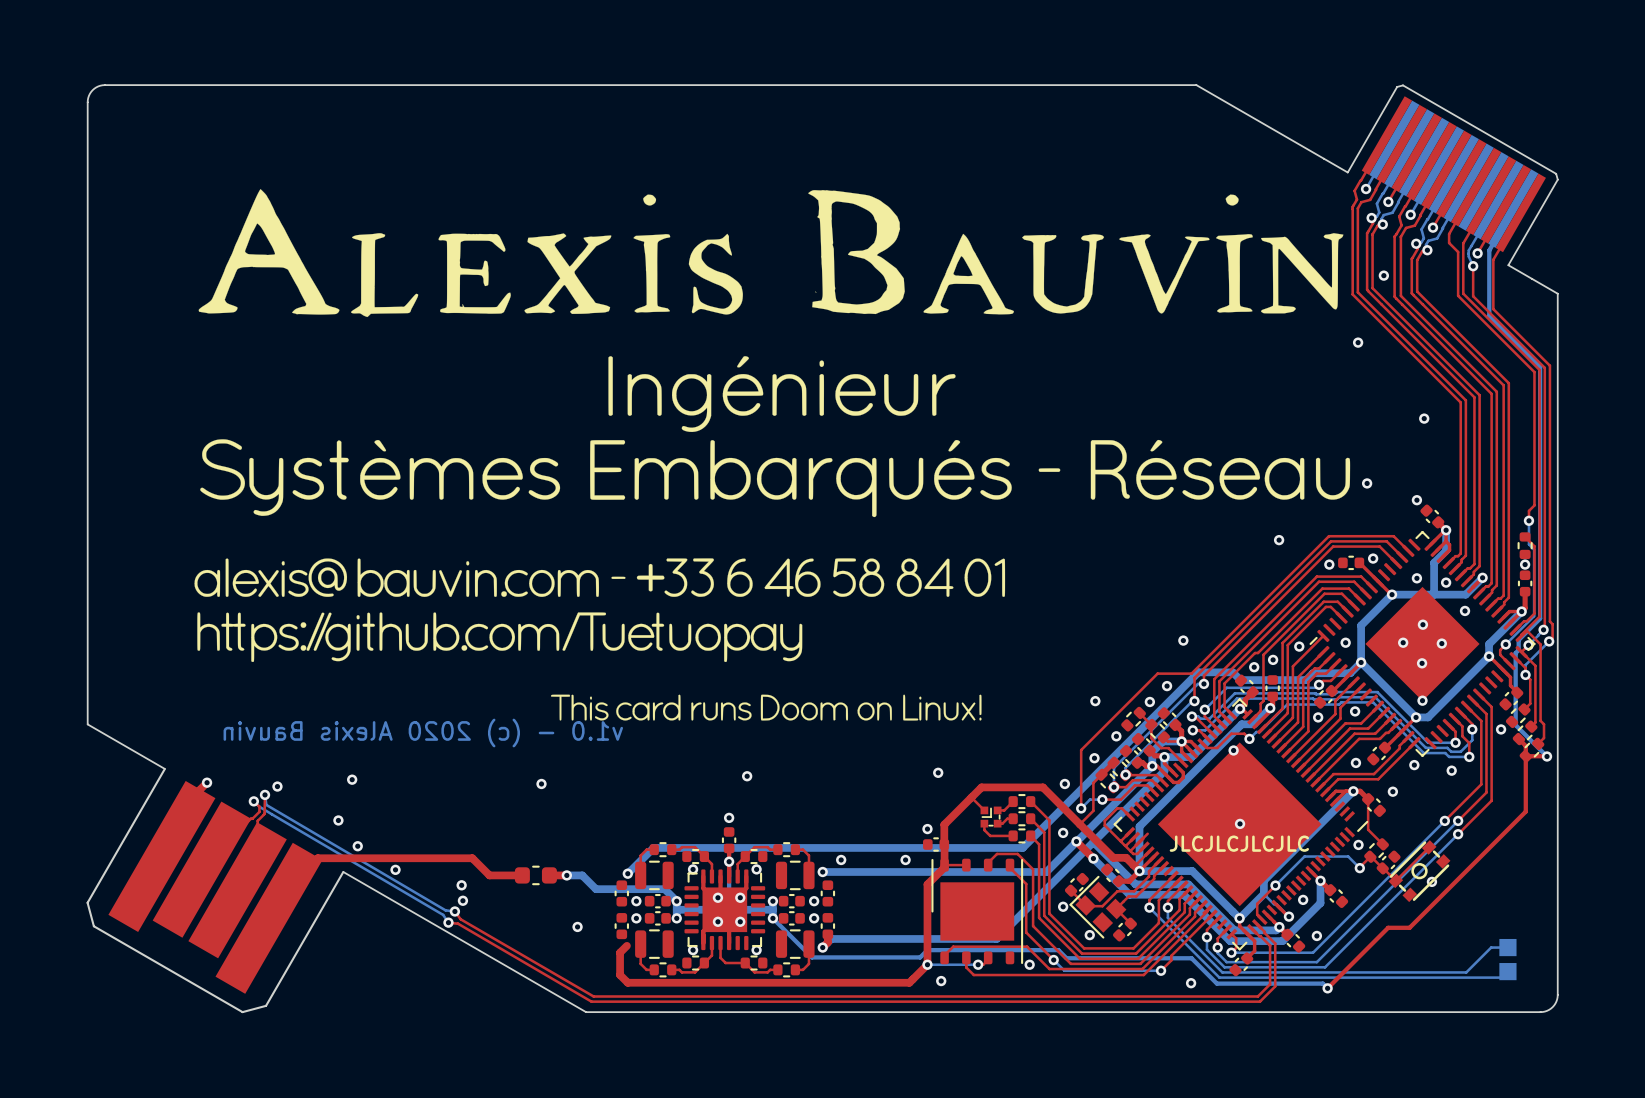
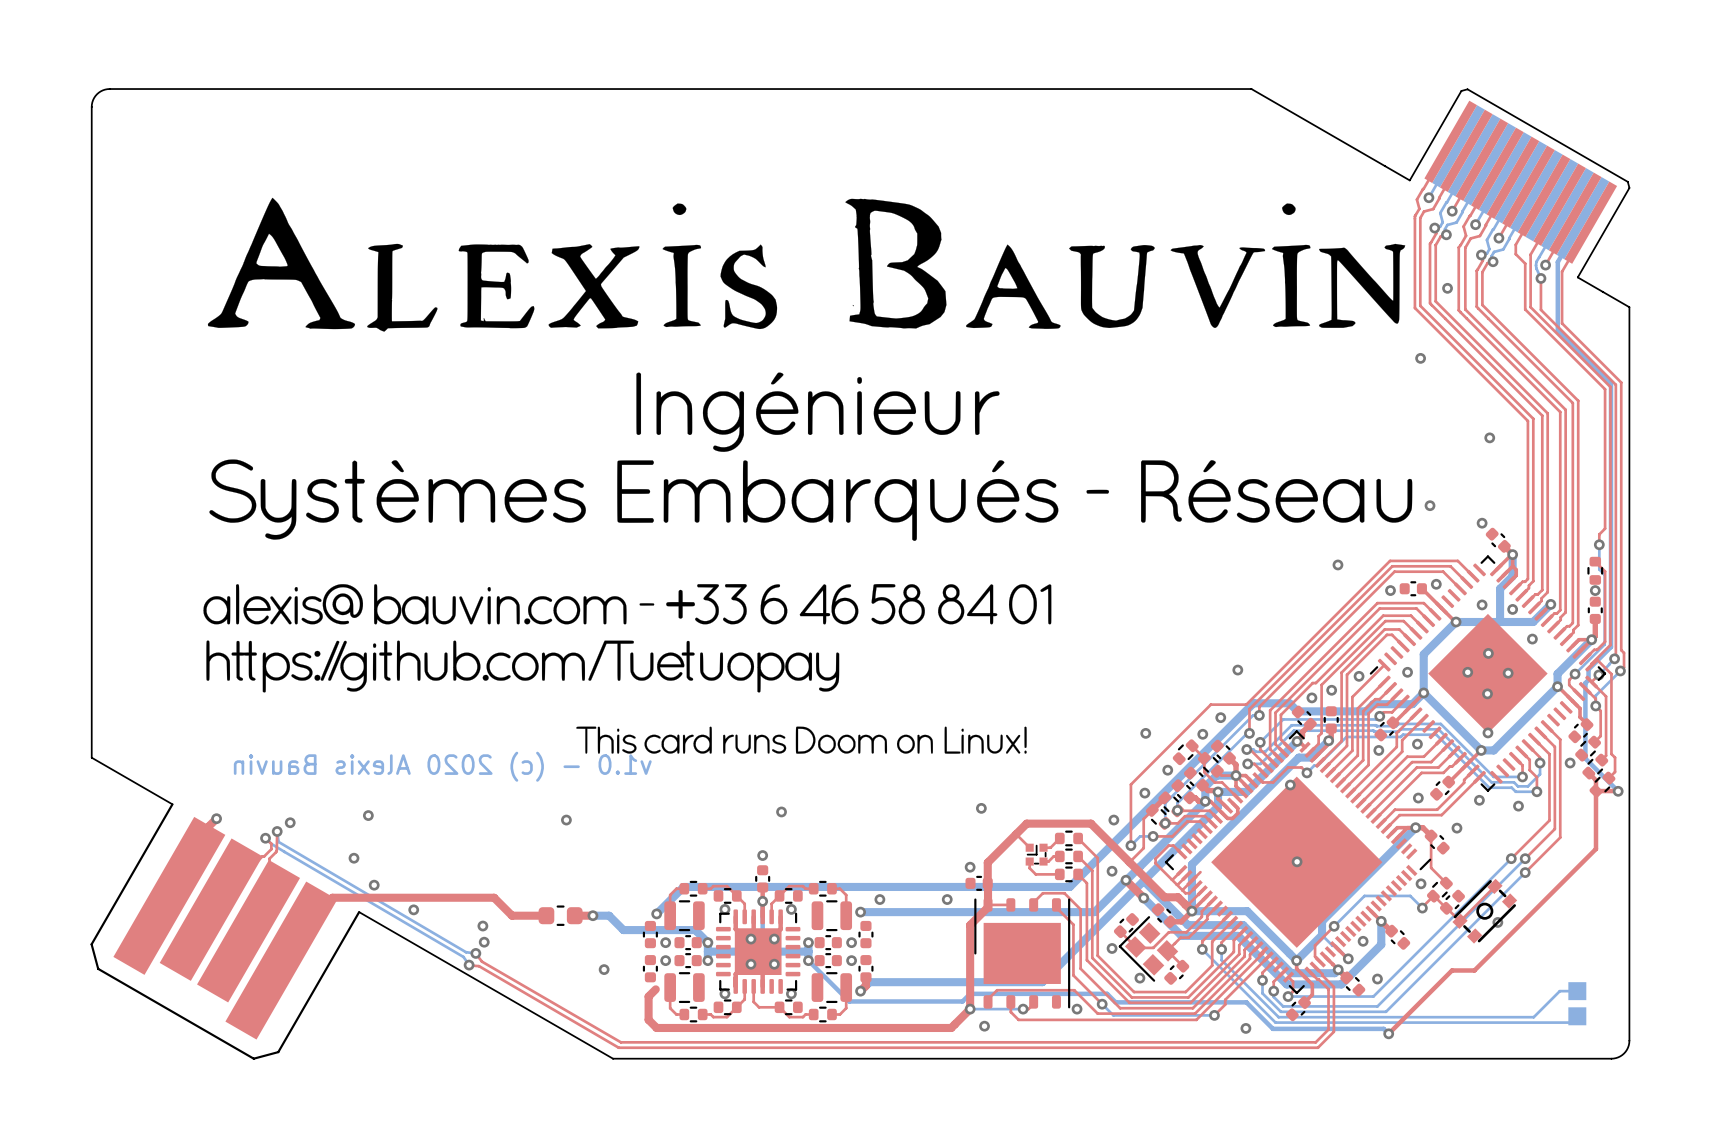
text: JLCJLCJLCJLC (1239, 843) -> none

